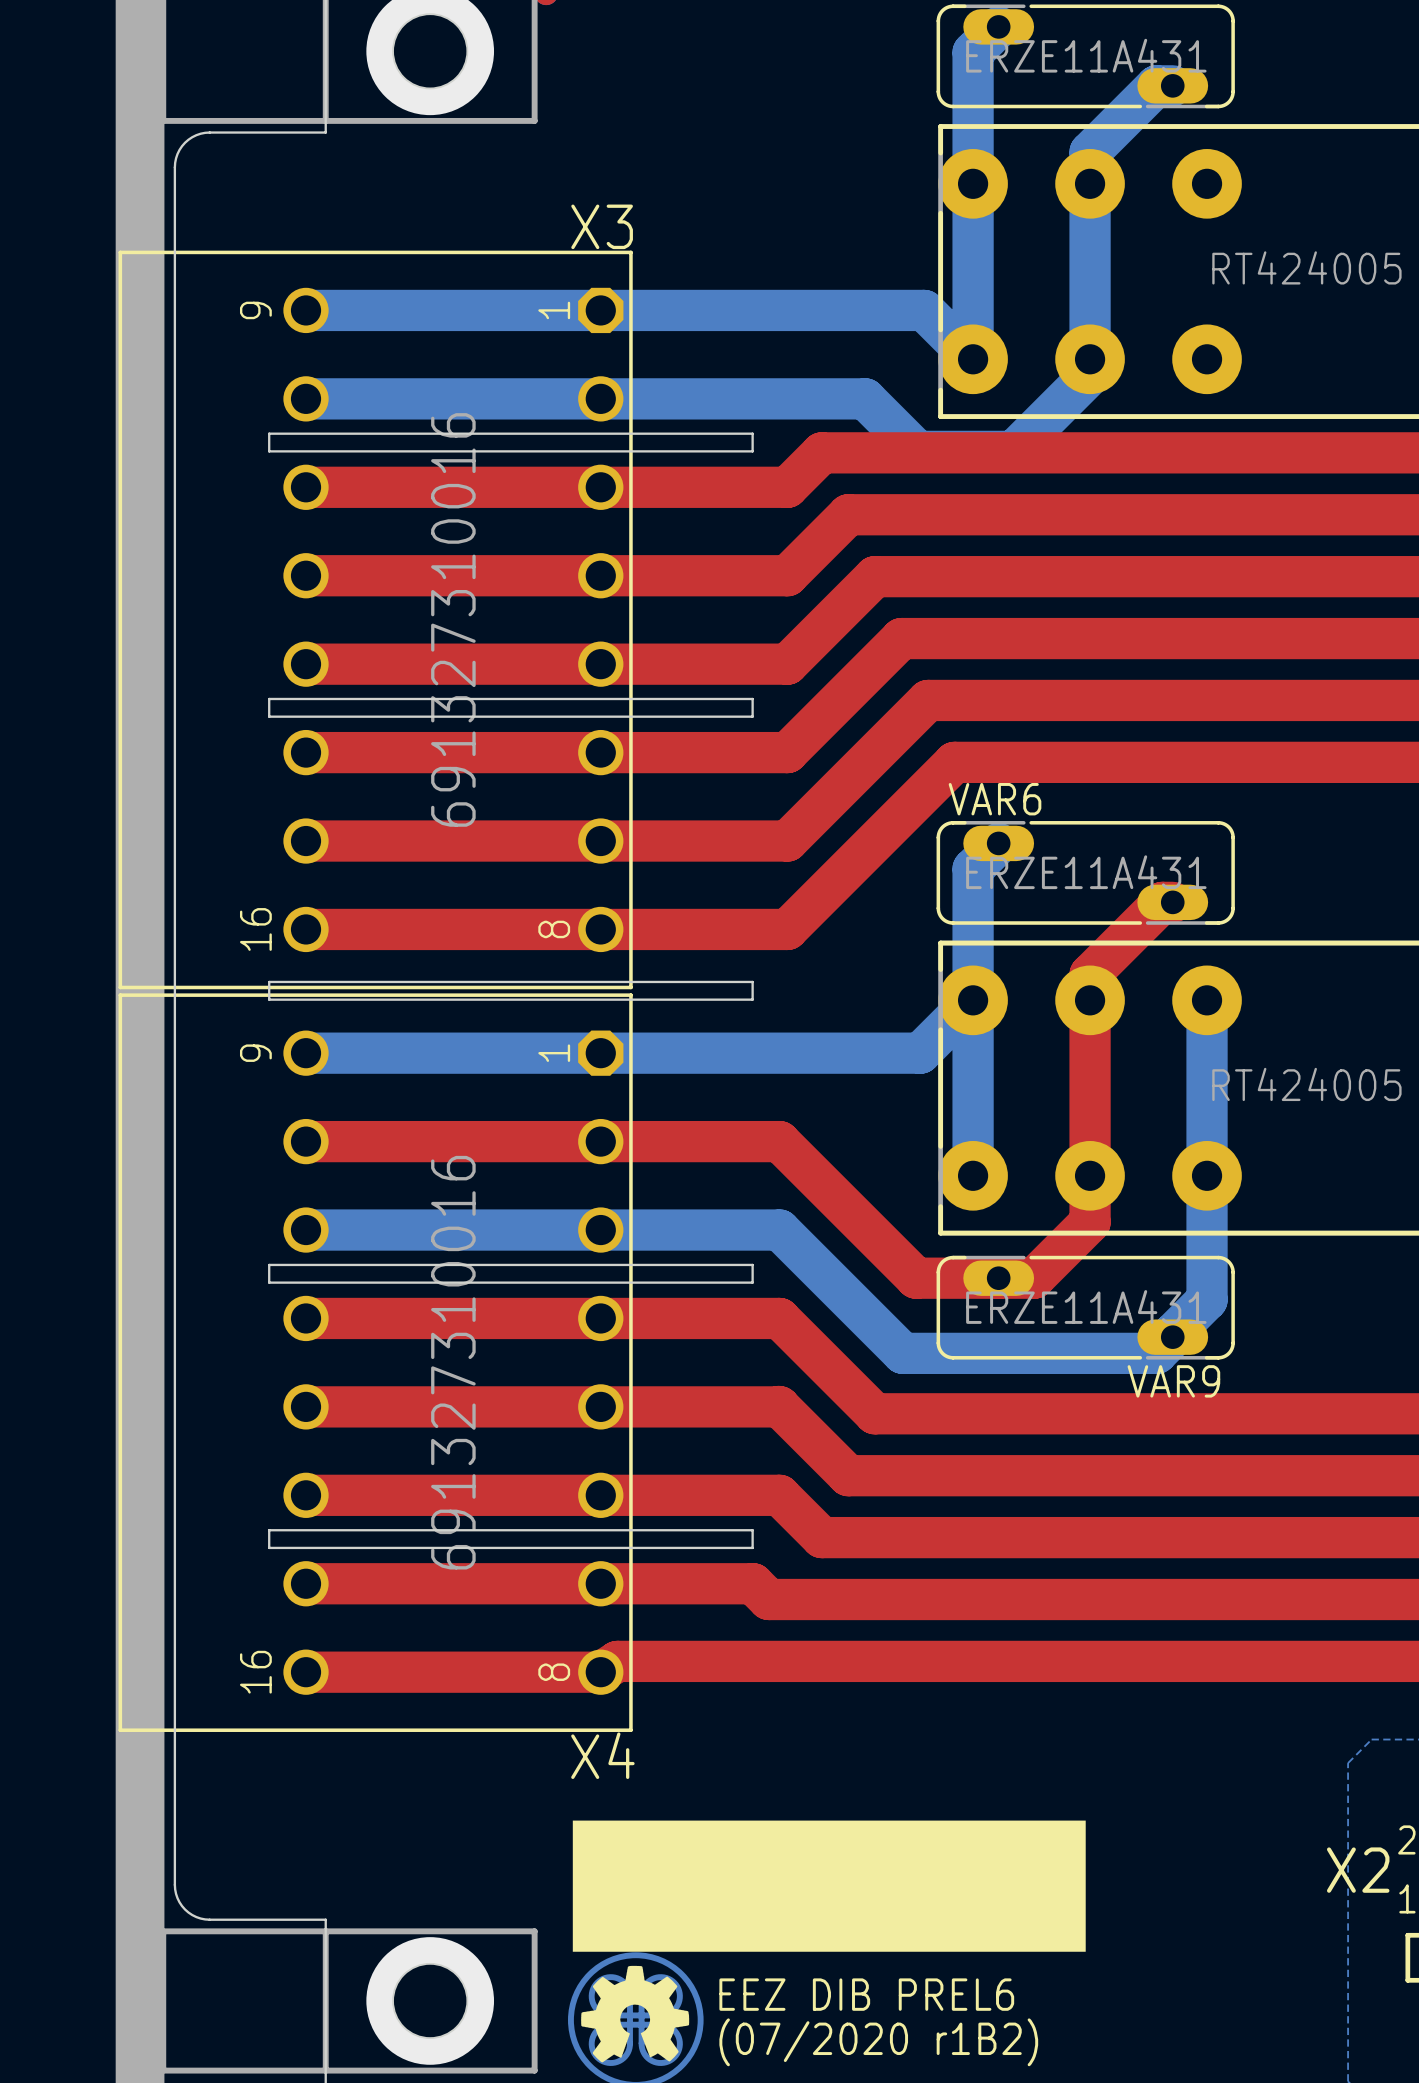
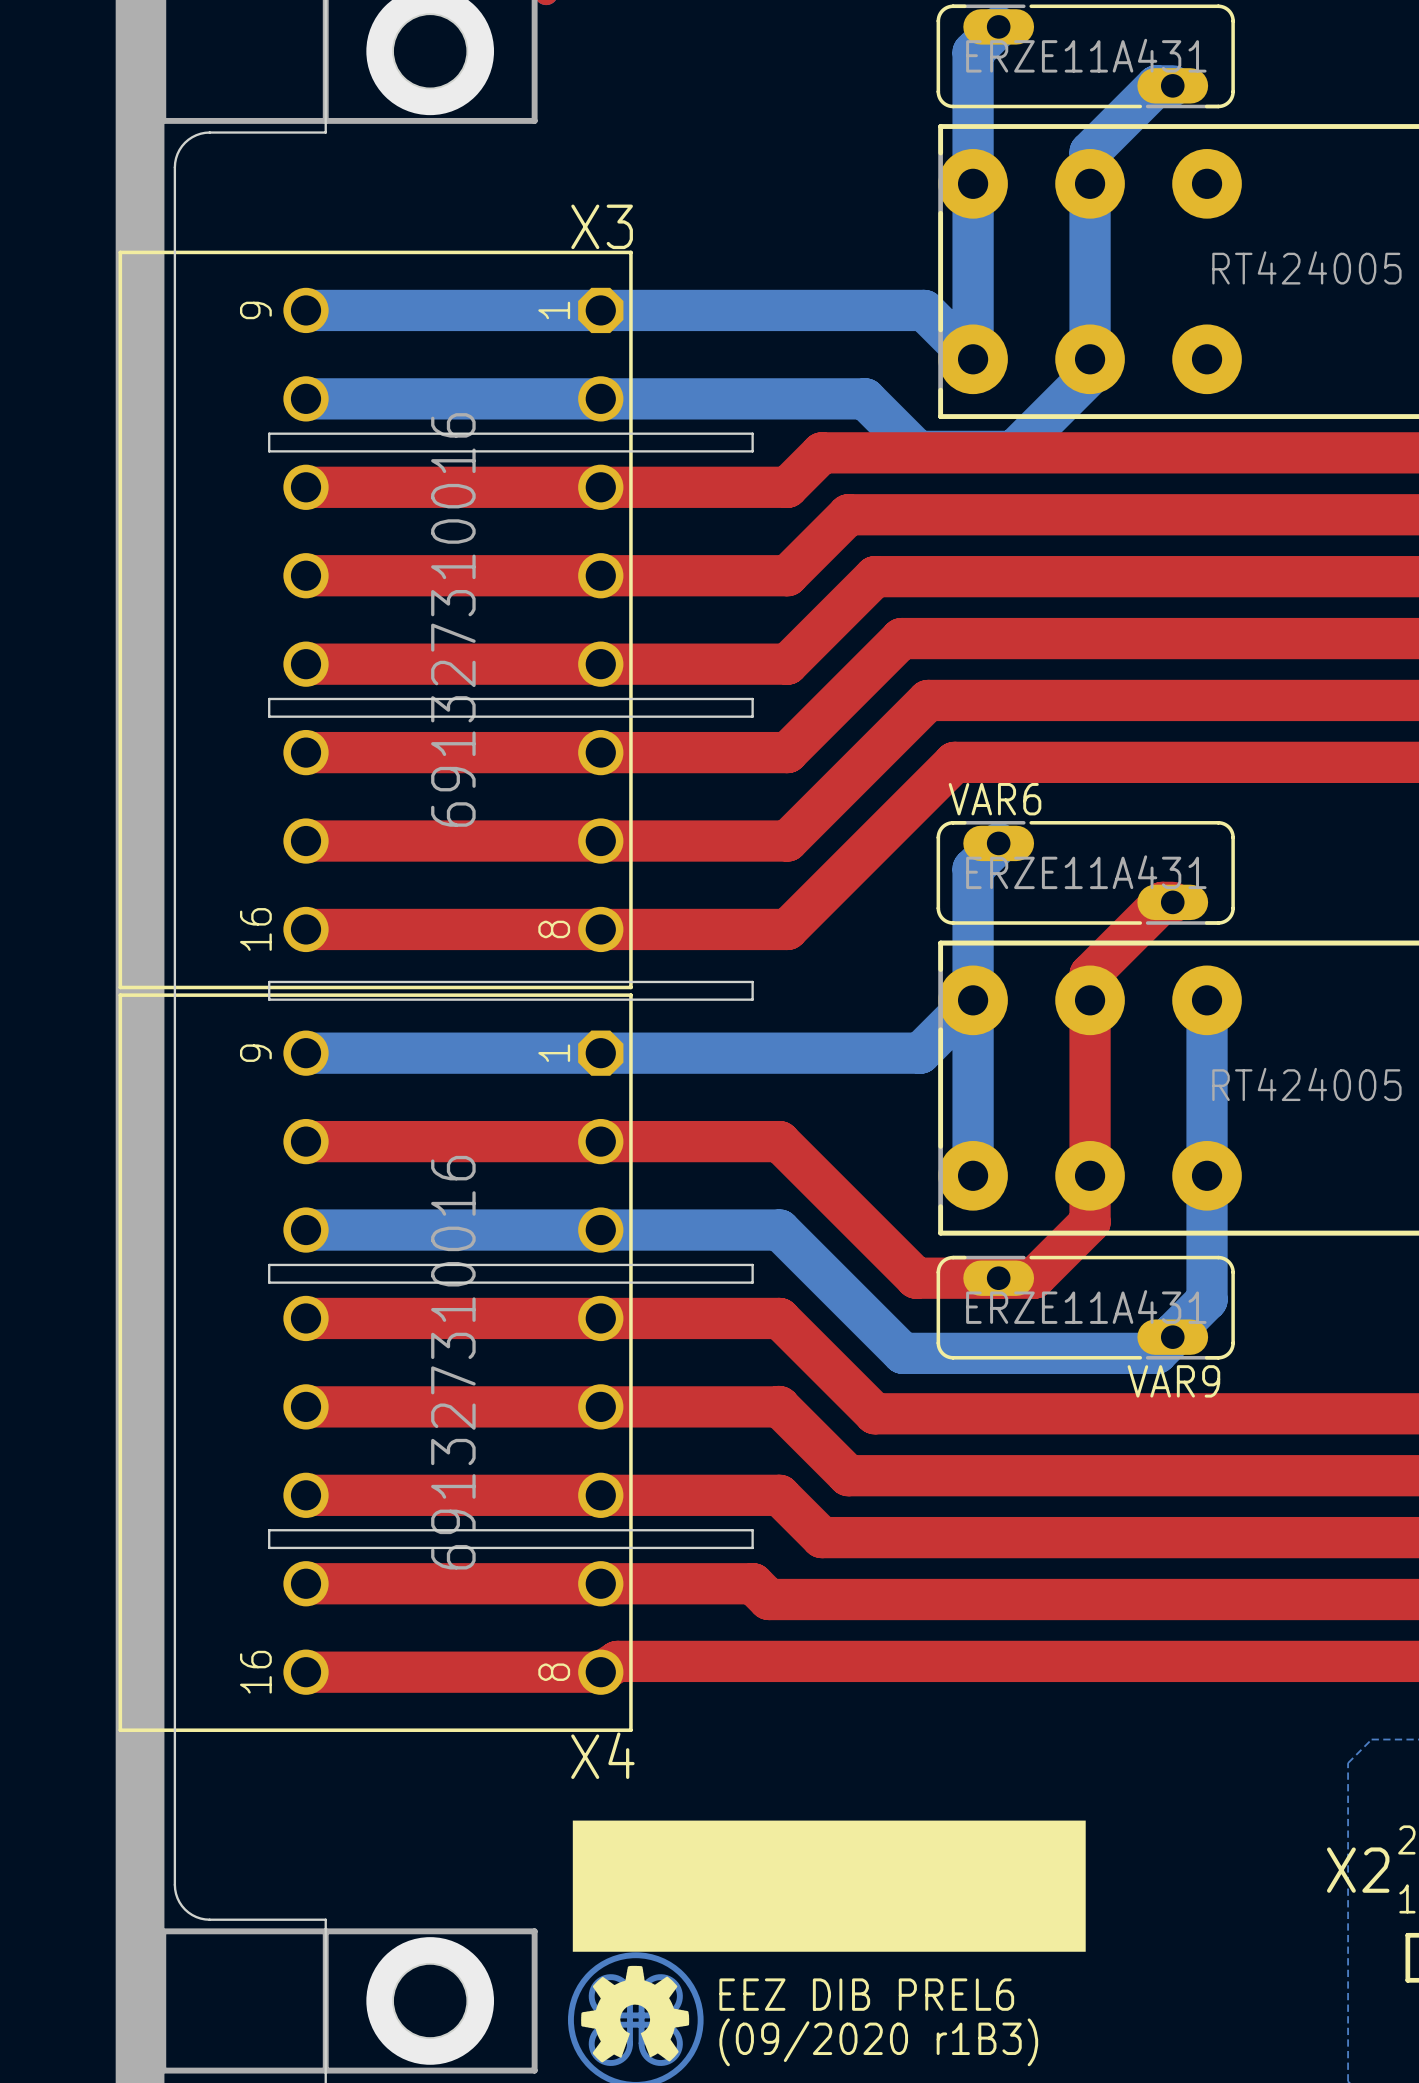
text: (07/2020 r1B2) (878, 2042) -> (09/2020 r1B3) (878, 2042)

